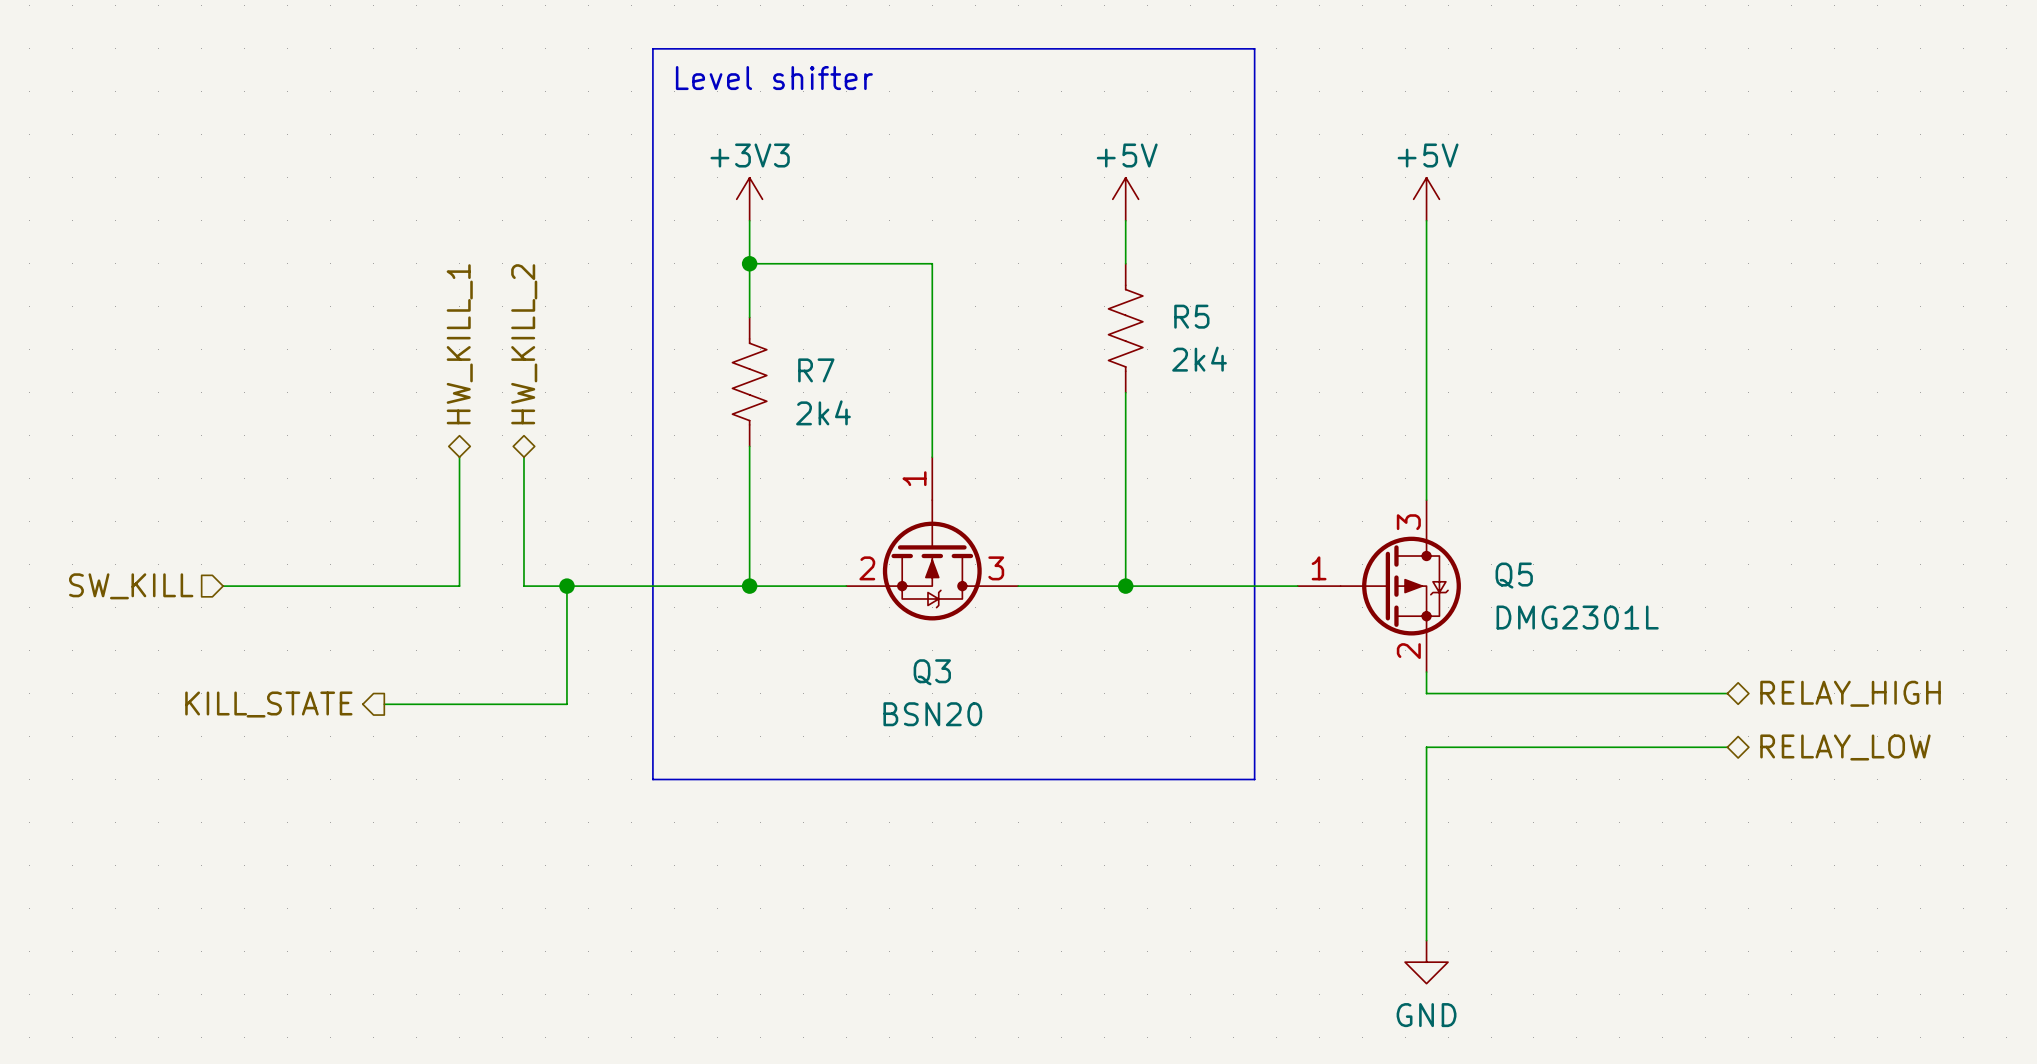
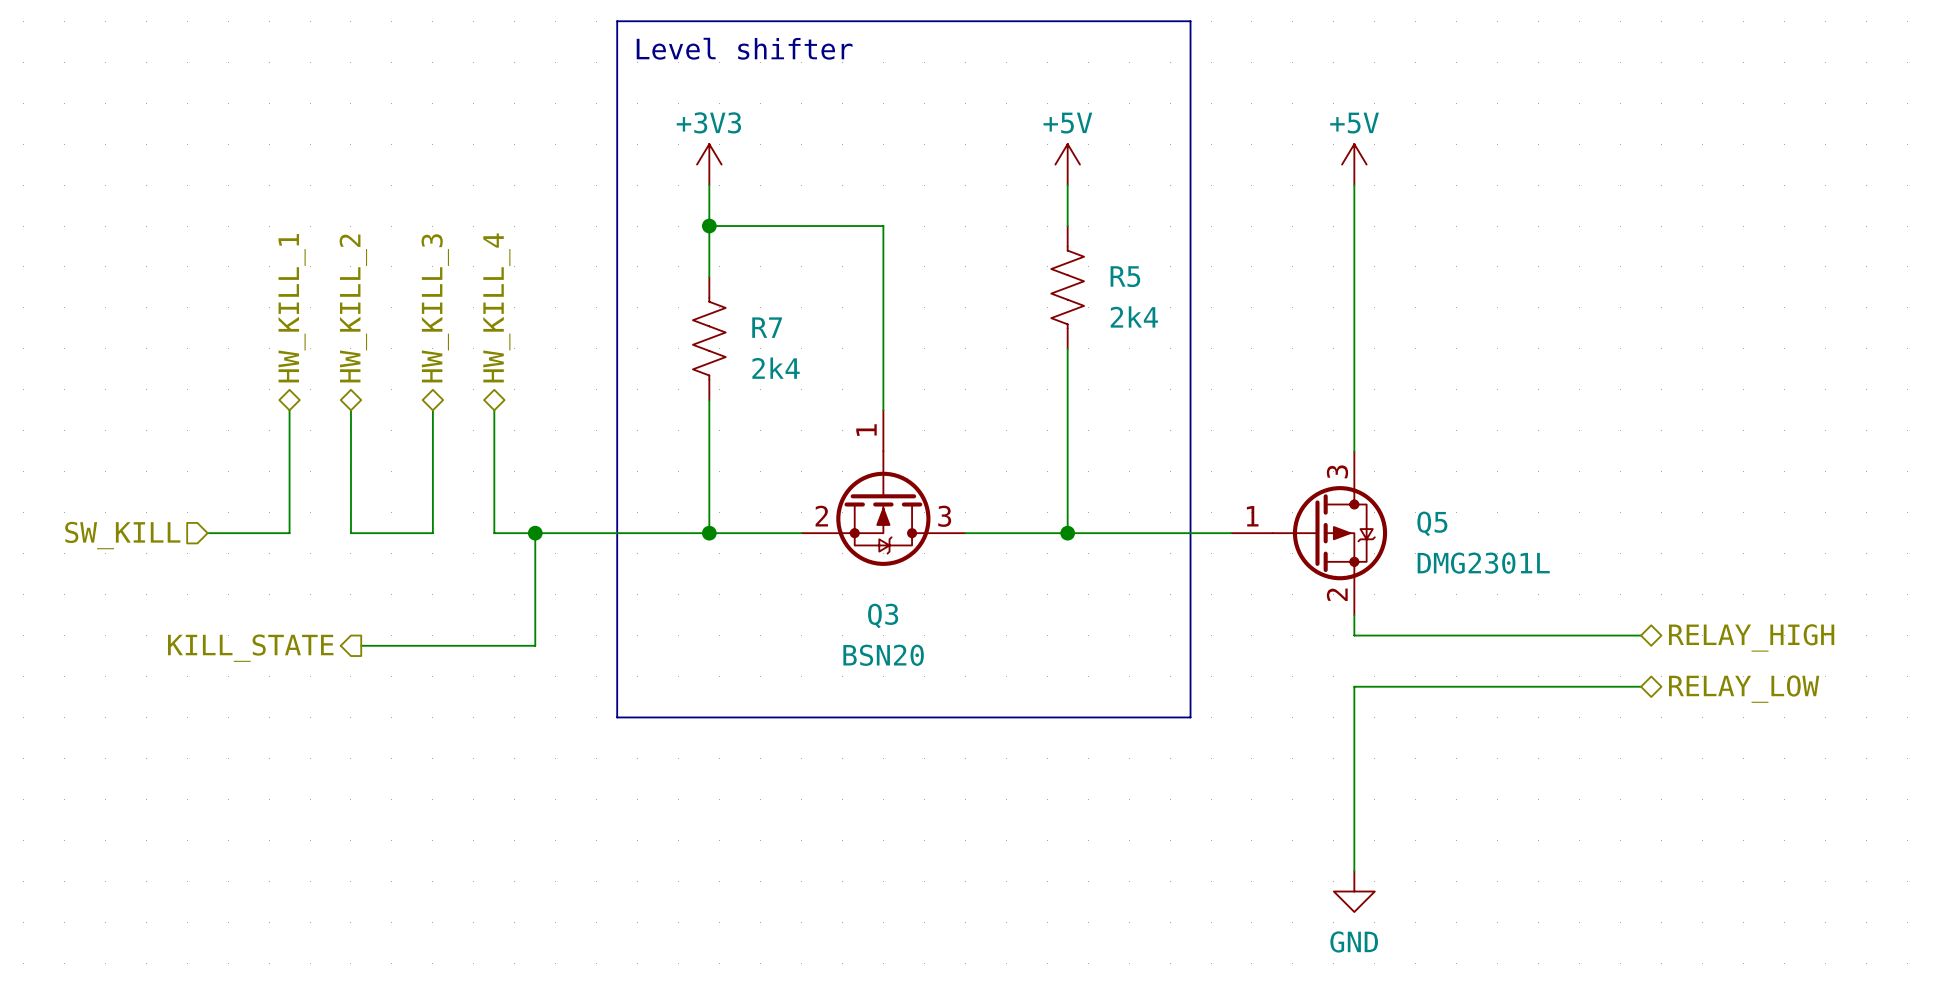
hierarchical label: none -> HW_KILL_1 (292, 308)
hierarchical label: none -> HW_KILL_2 (353, 308)
hierarchical label: HW_KILL_1 (459, 344) -> HW_KILL_3 (435, 308)
hierarchical label: HW_KILL_2 (524, 344) -> HW_KILL_4 (496, 307)
wire: none -> (350, 410) (350, 533)
wire: (309, 586) (373, 586) -> (289, 533) (289, 410)

